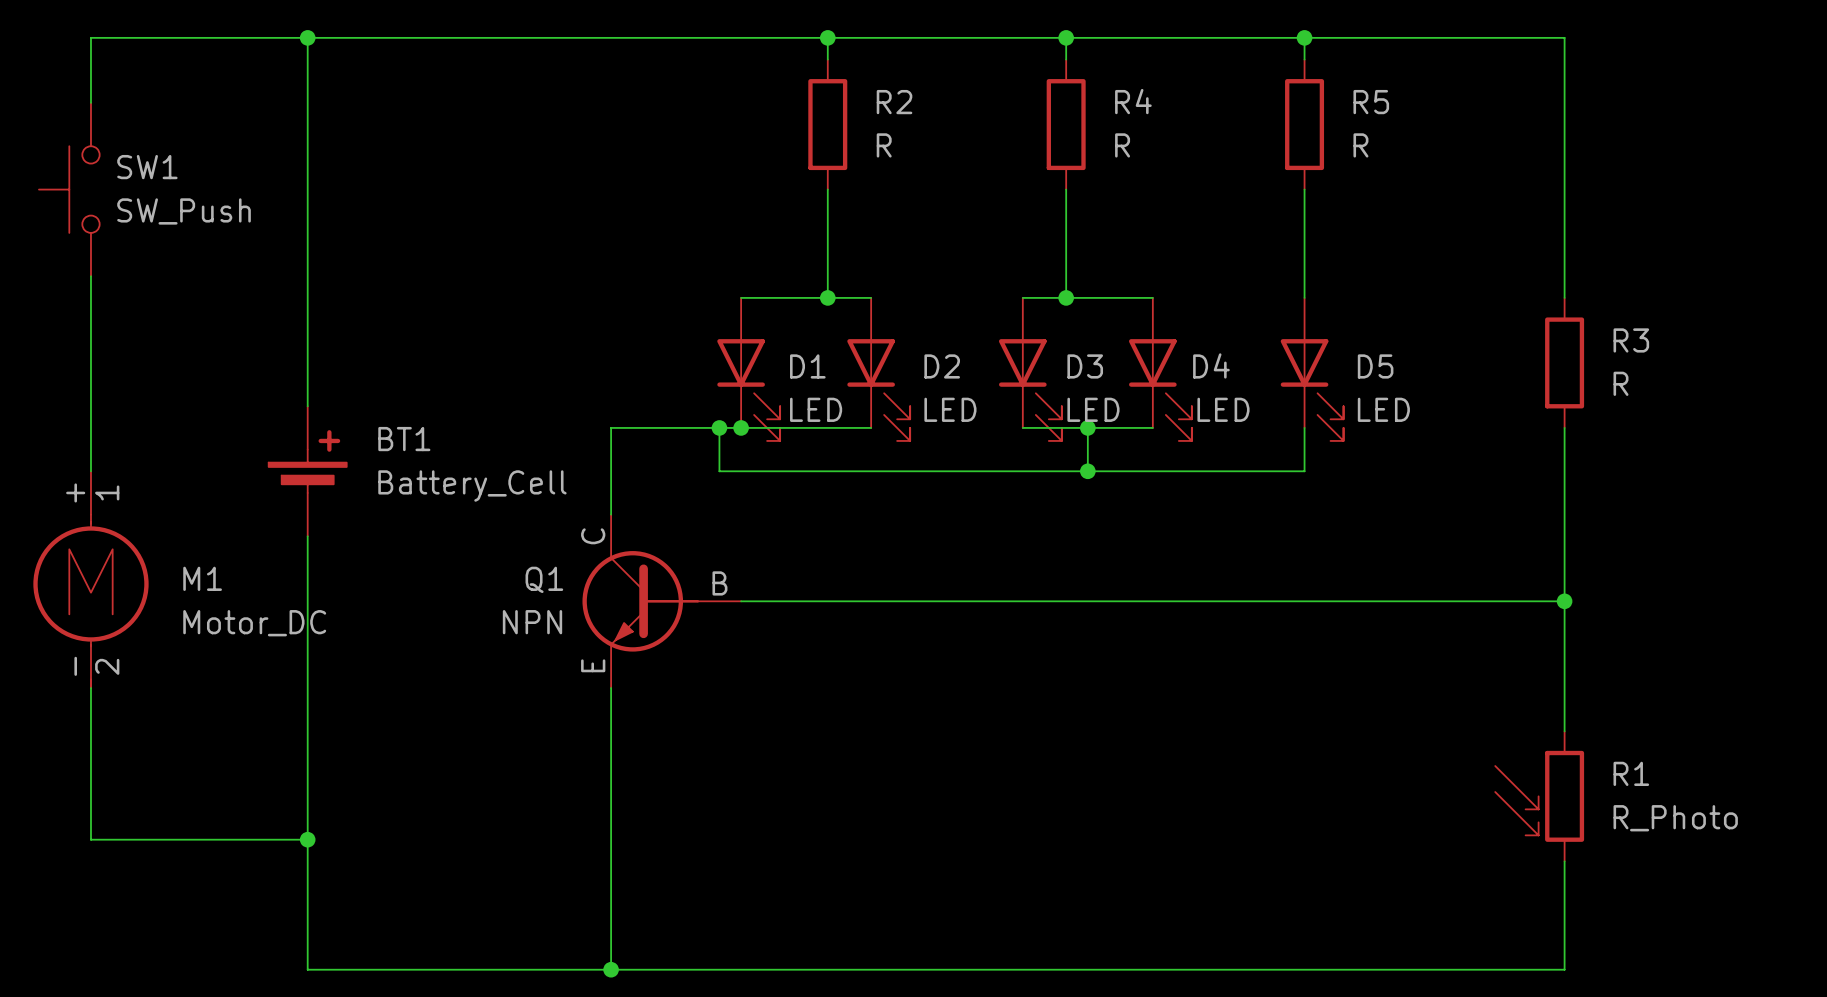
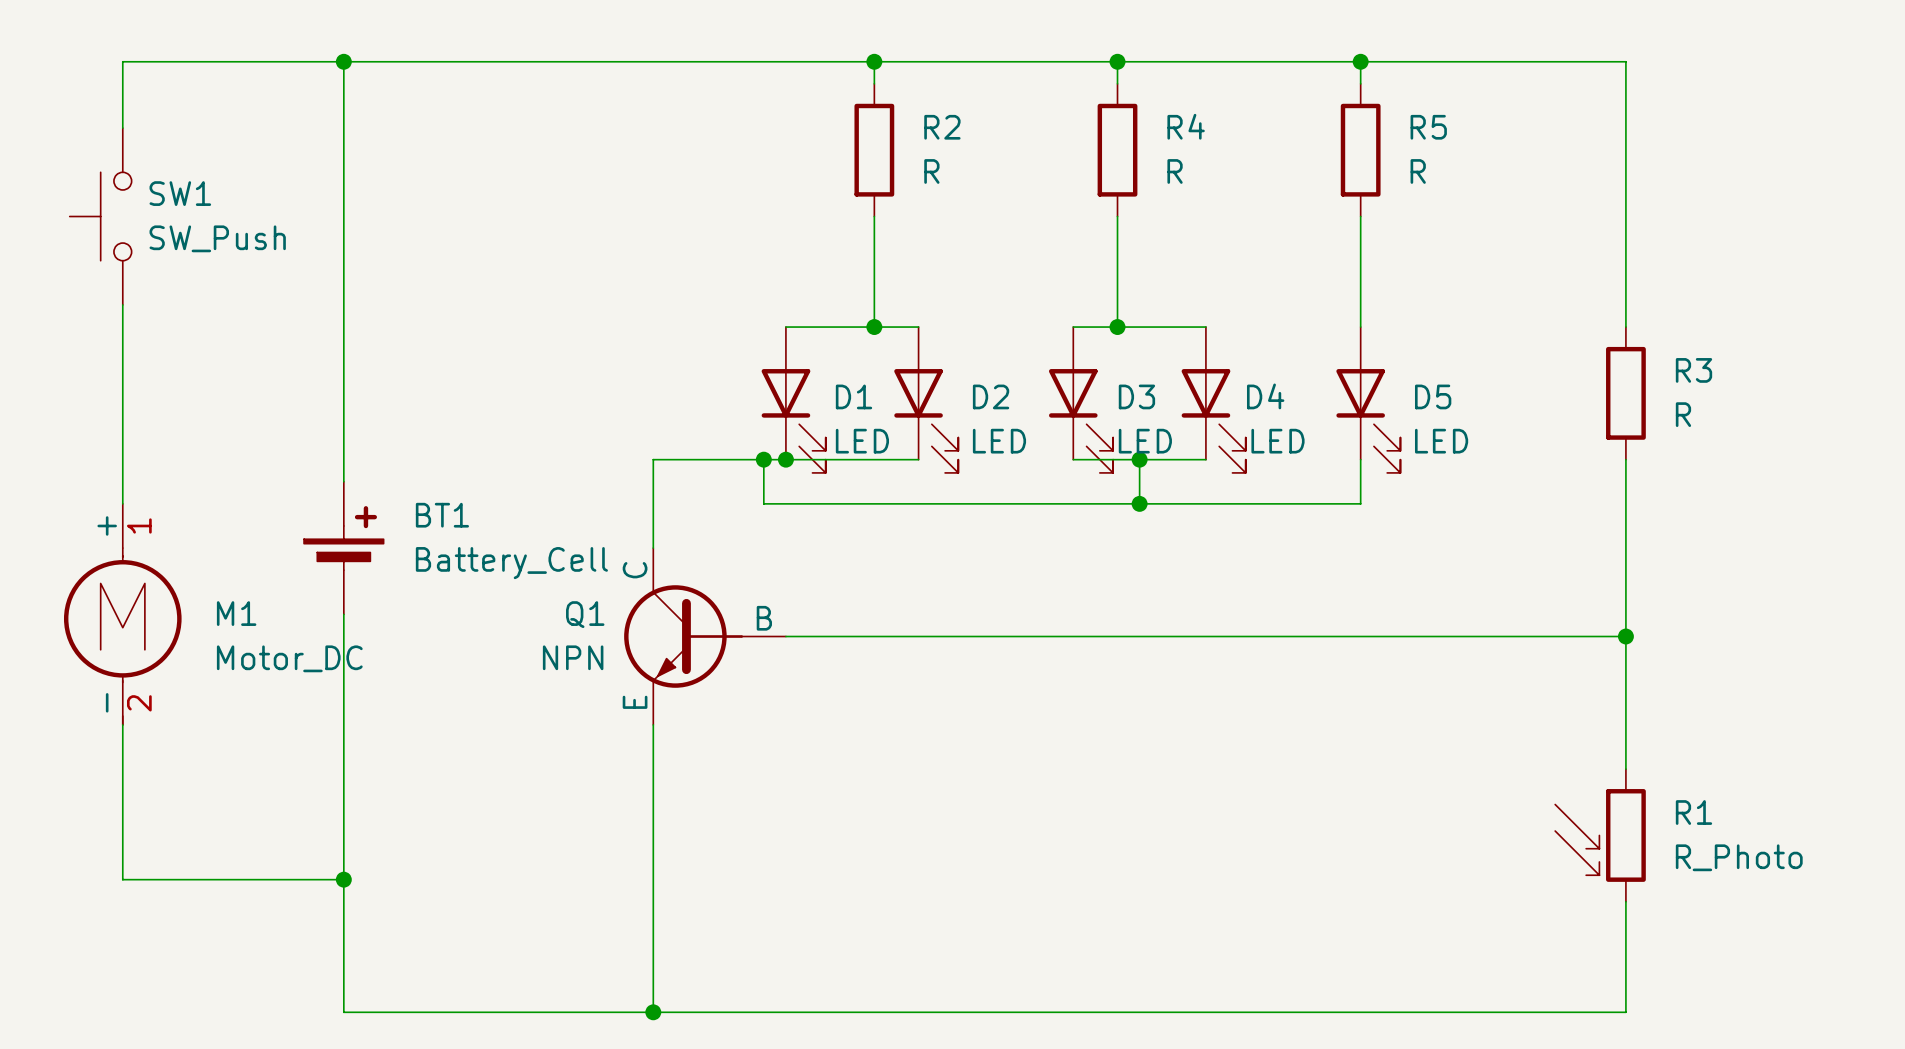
BT1 position: (307, 471) -> (343, 548)

